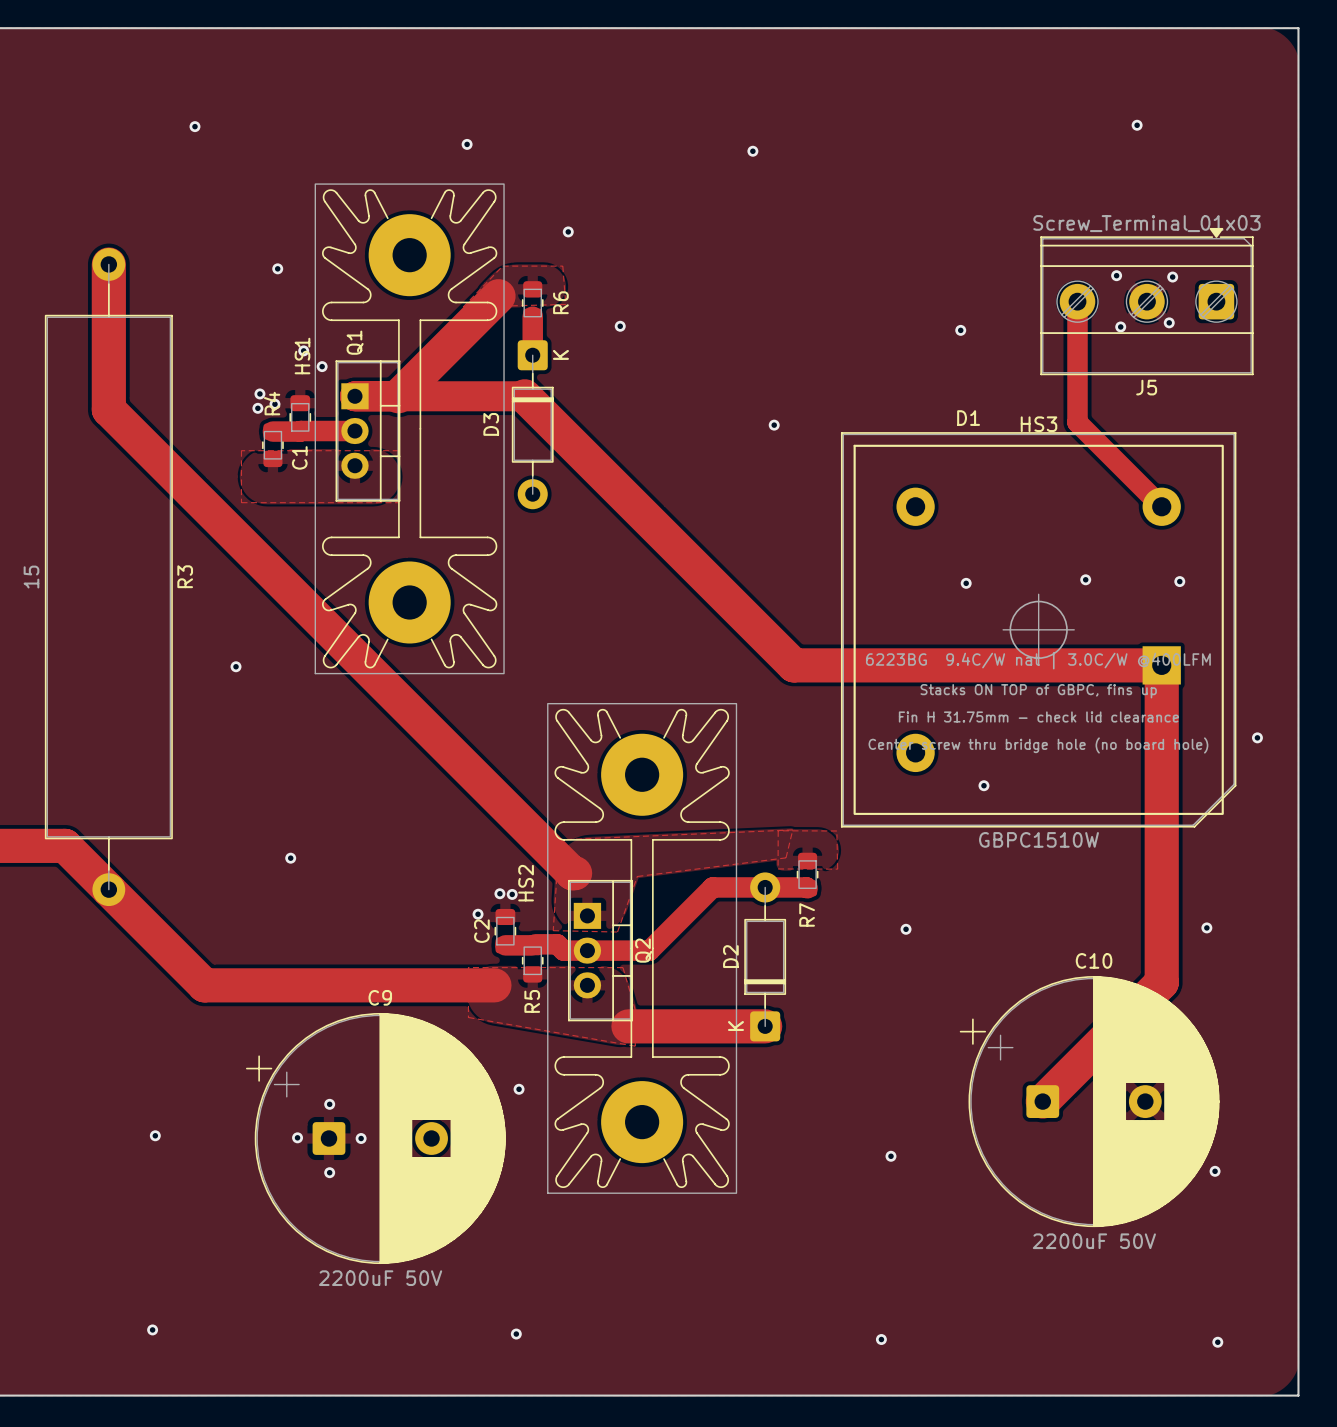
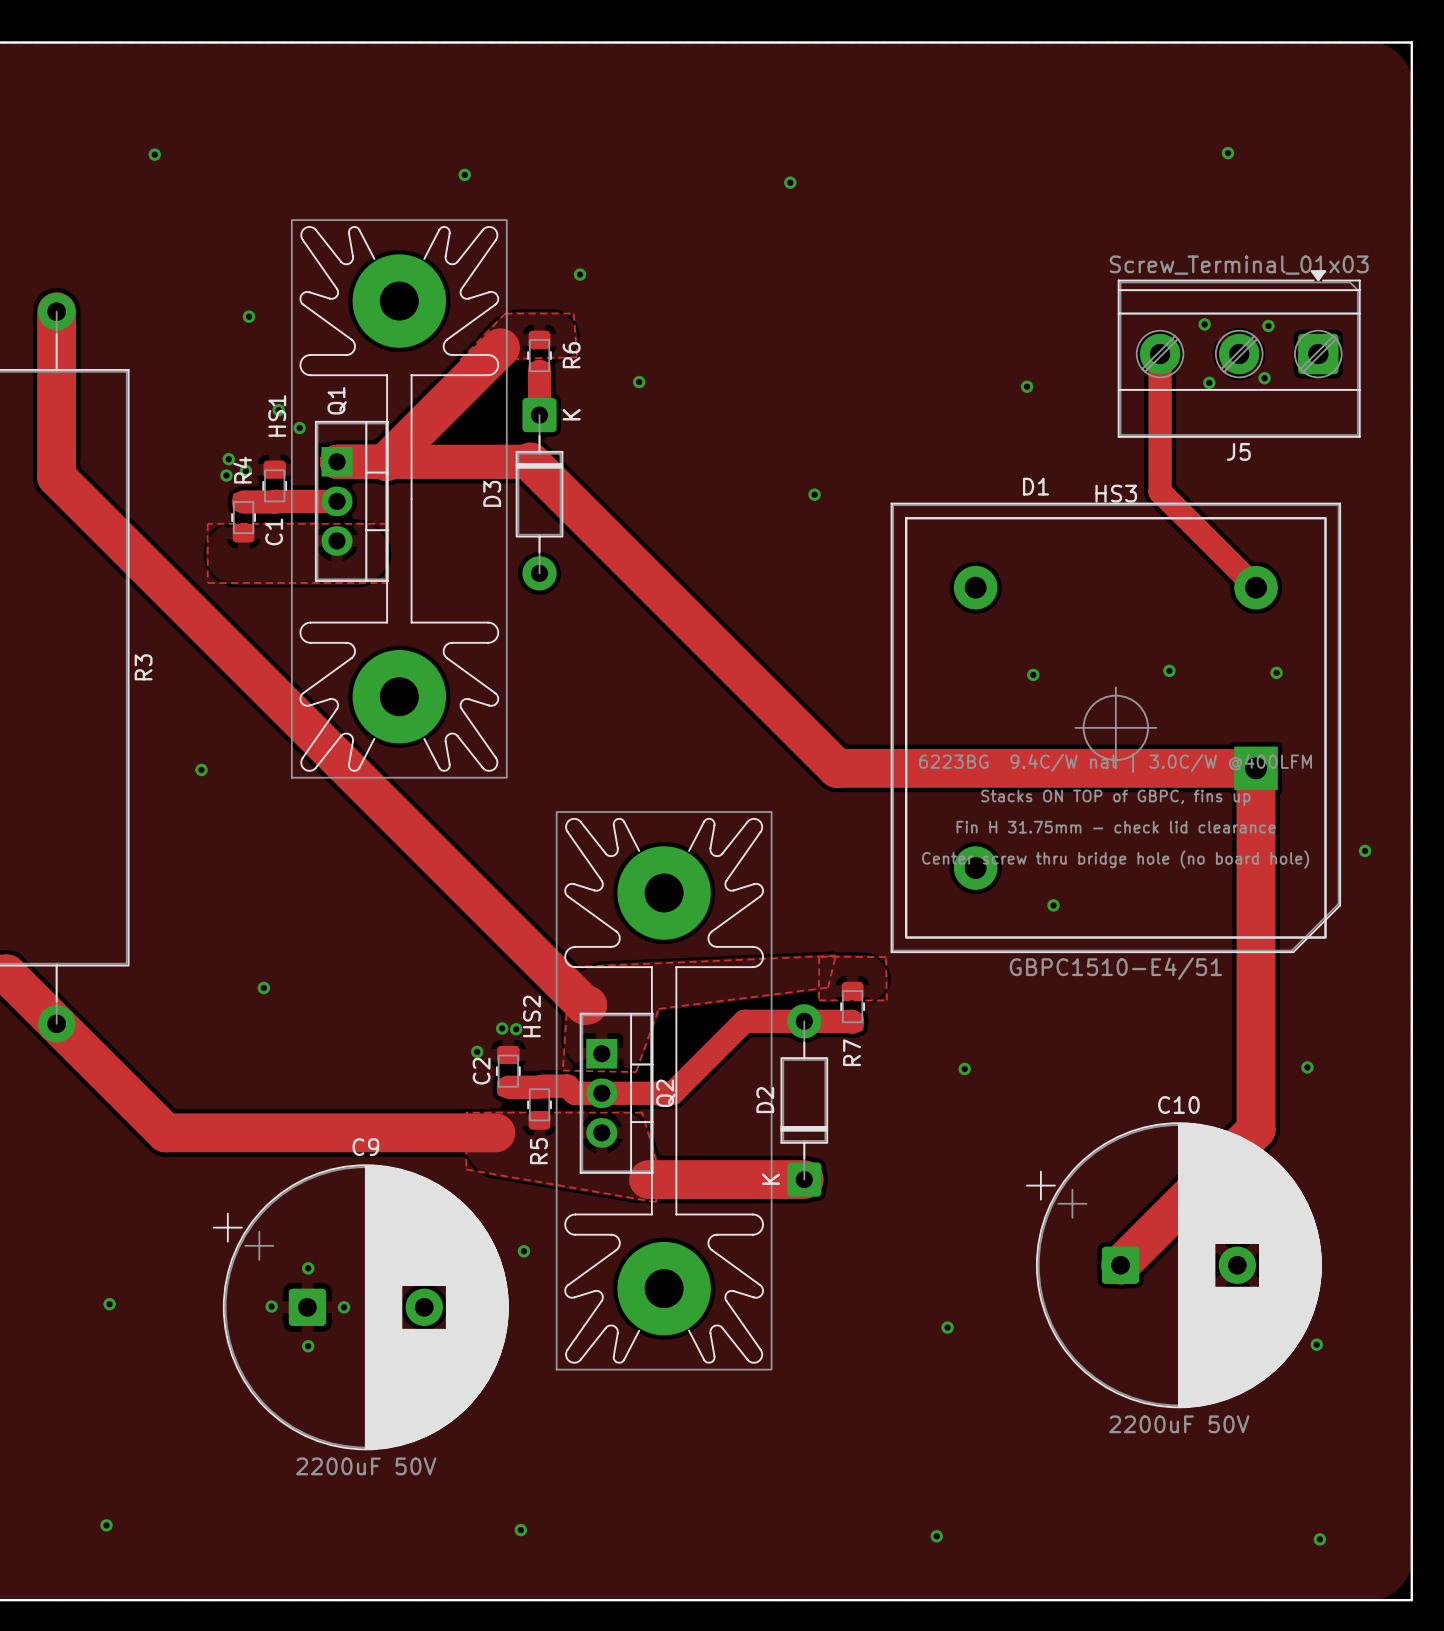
D1 value: GBPC1510W (1038, 839) -> GBPC1510-E4/51 (1115, 968)

